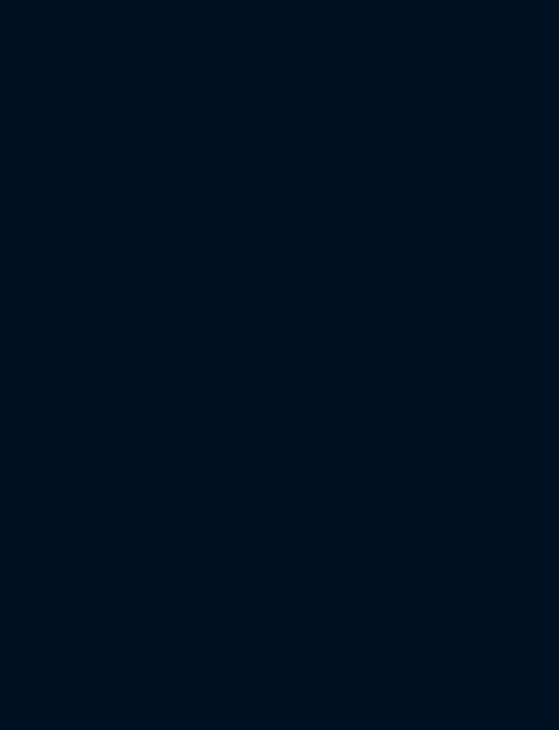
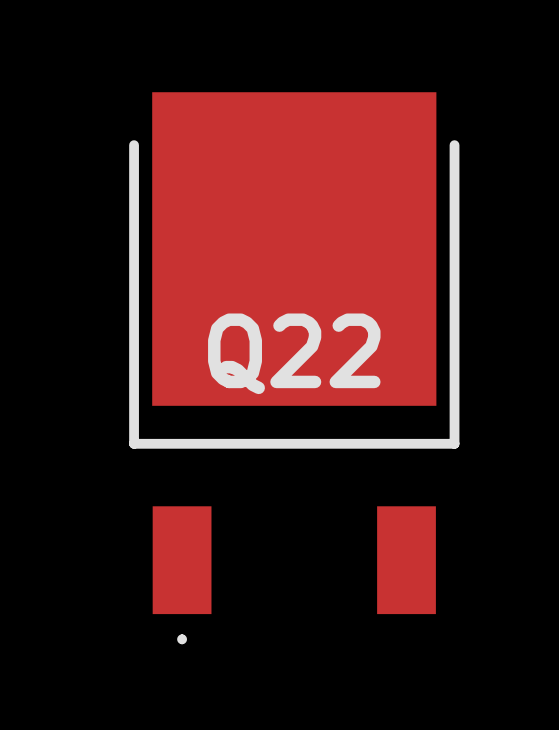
Q22: none -> (294, 368)

